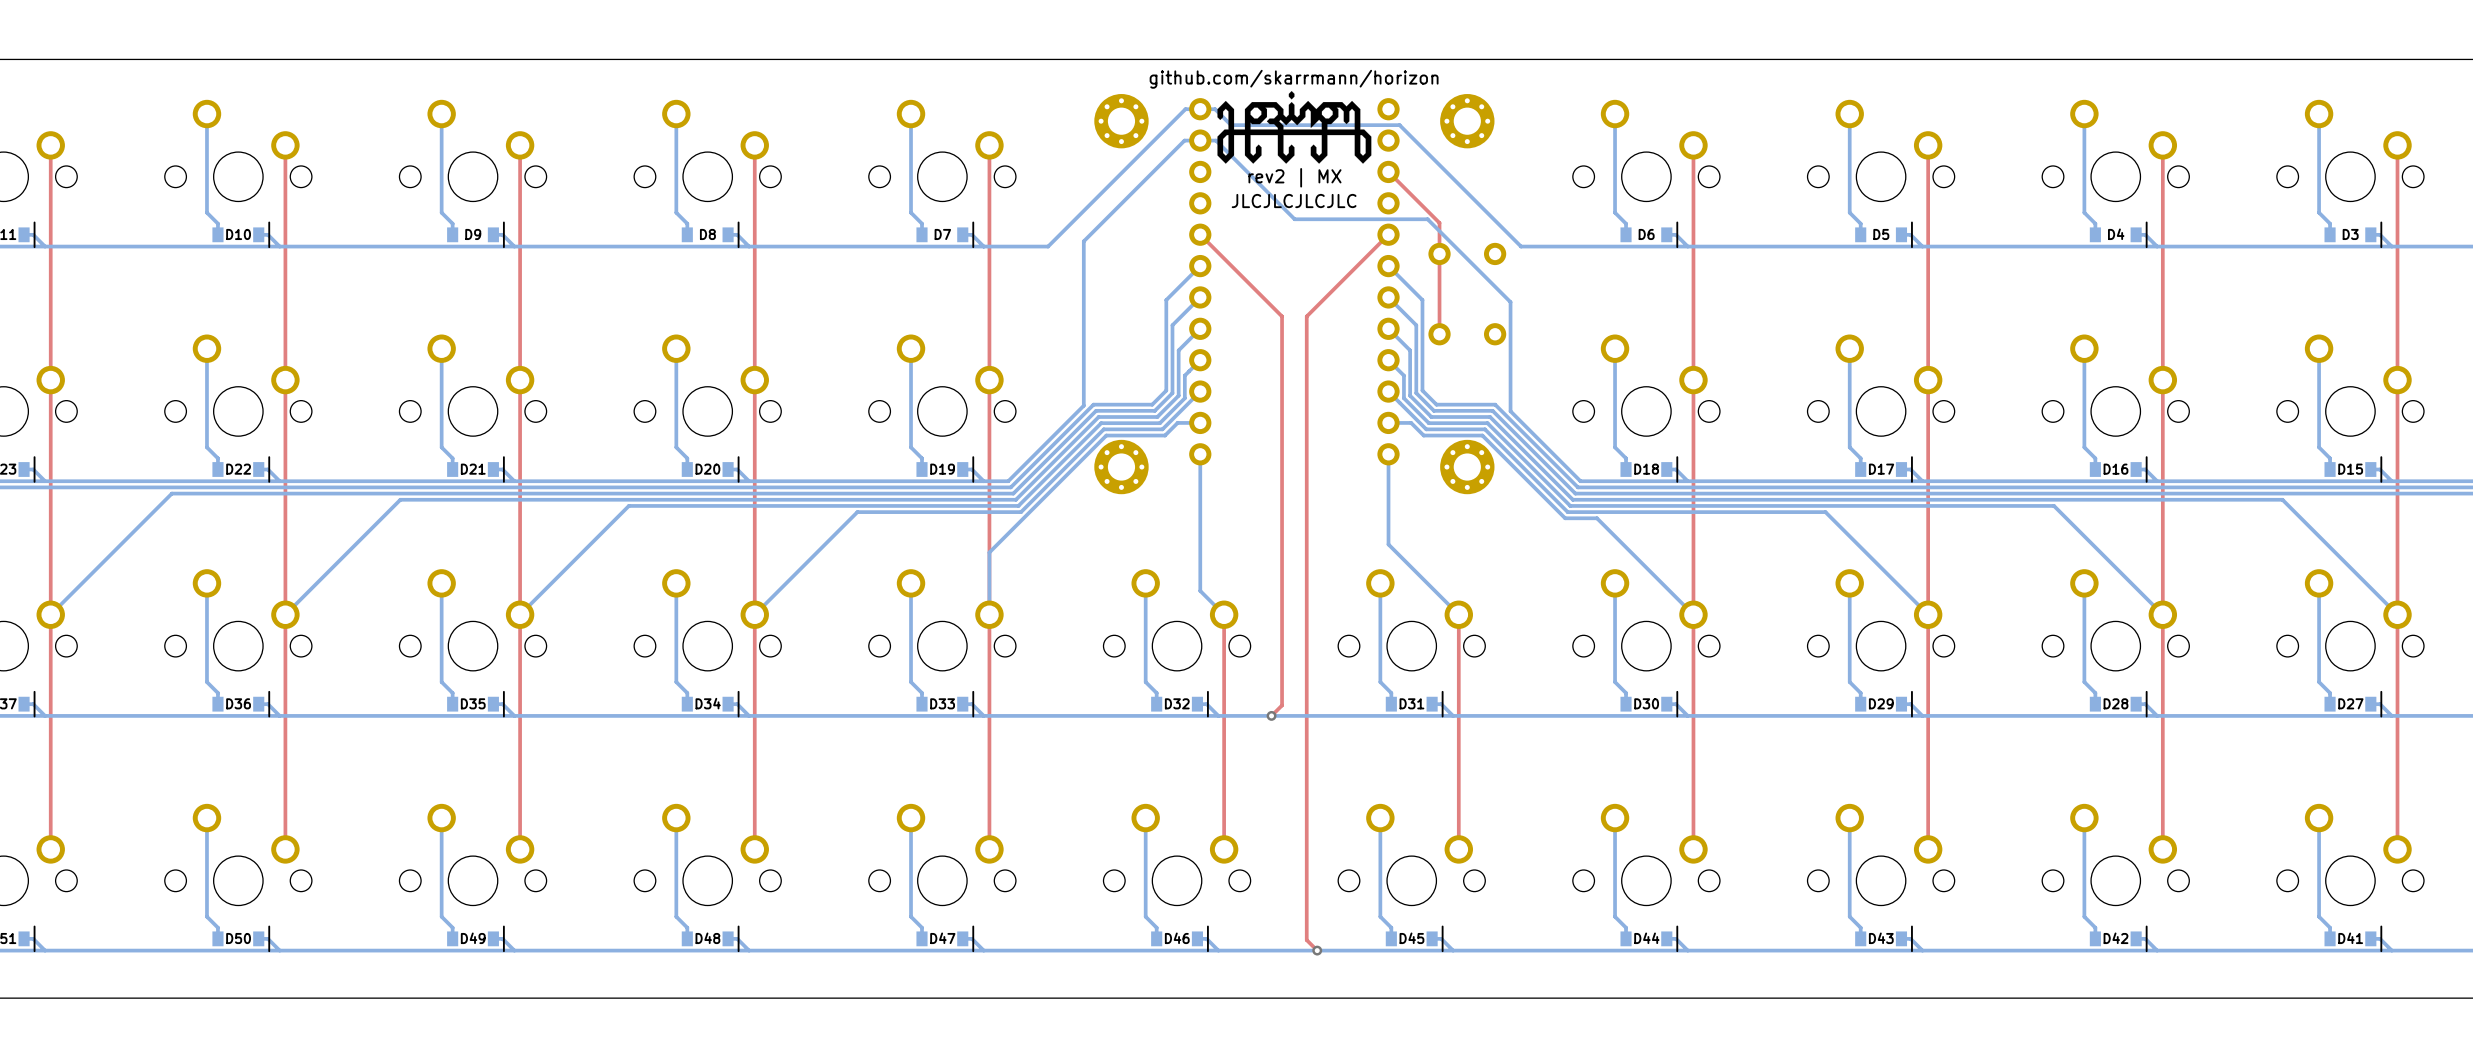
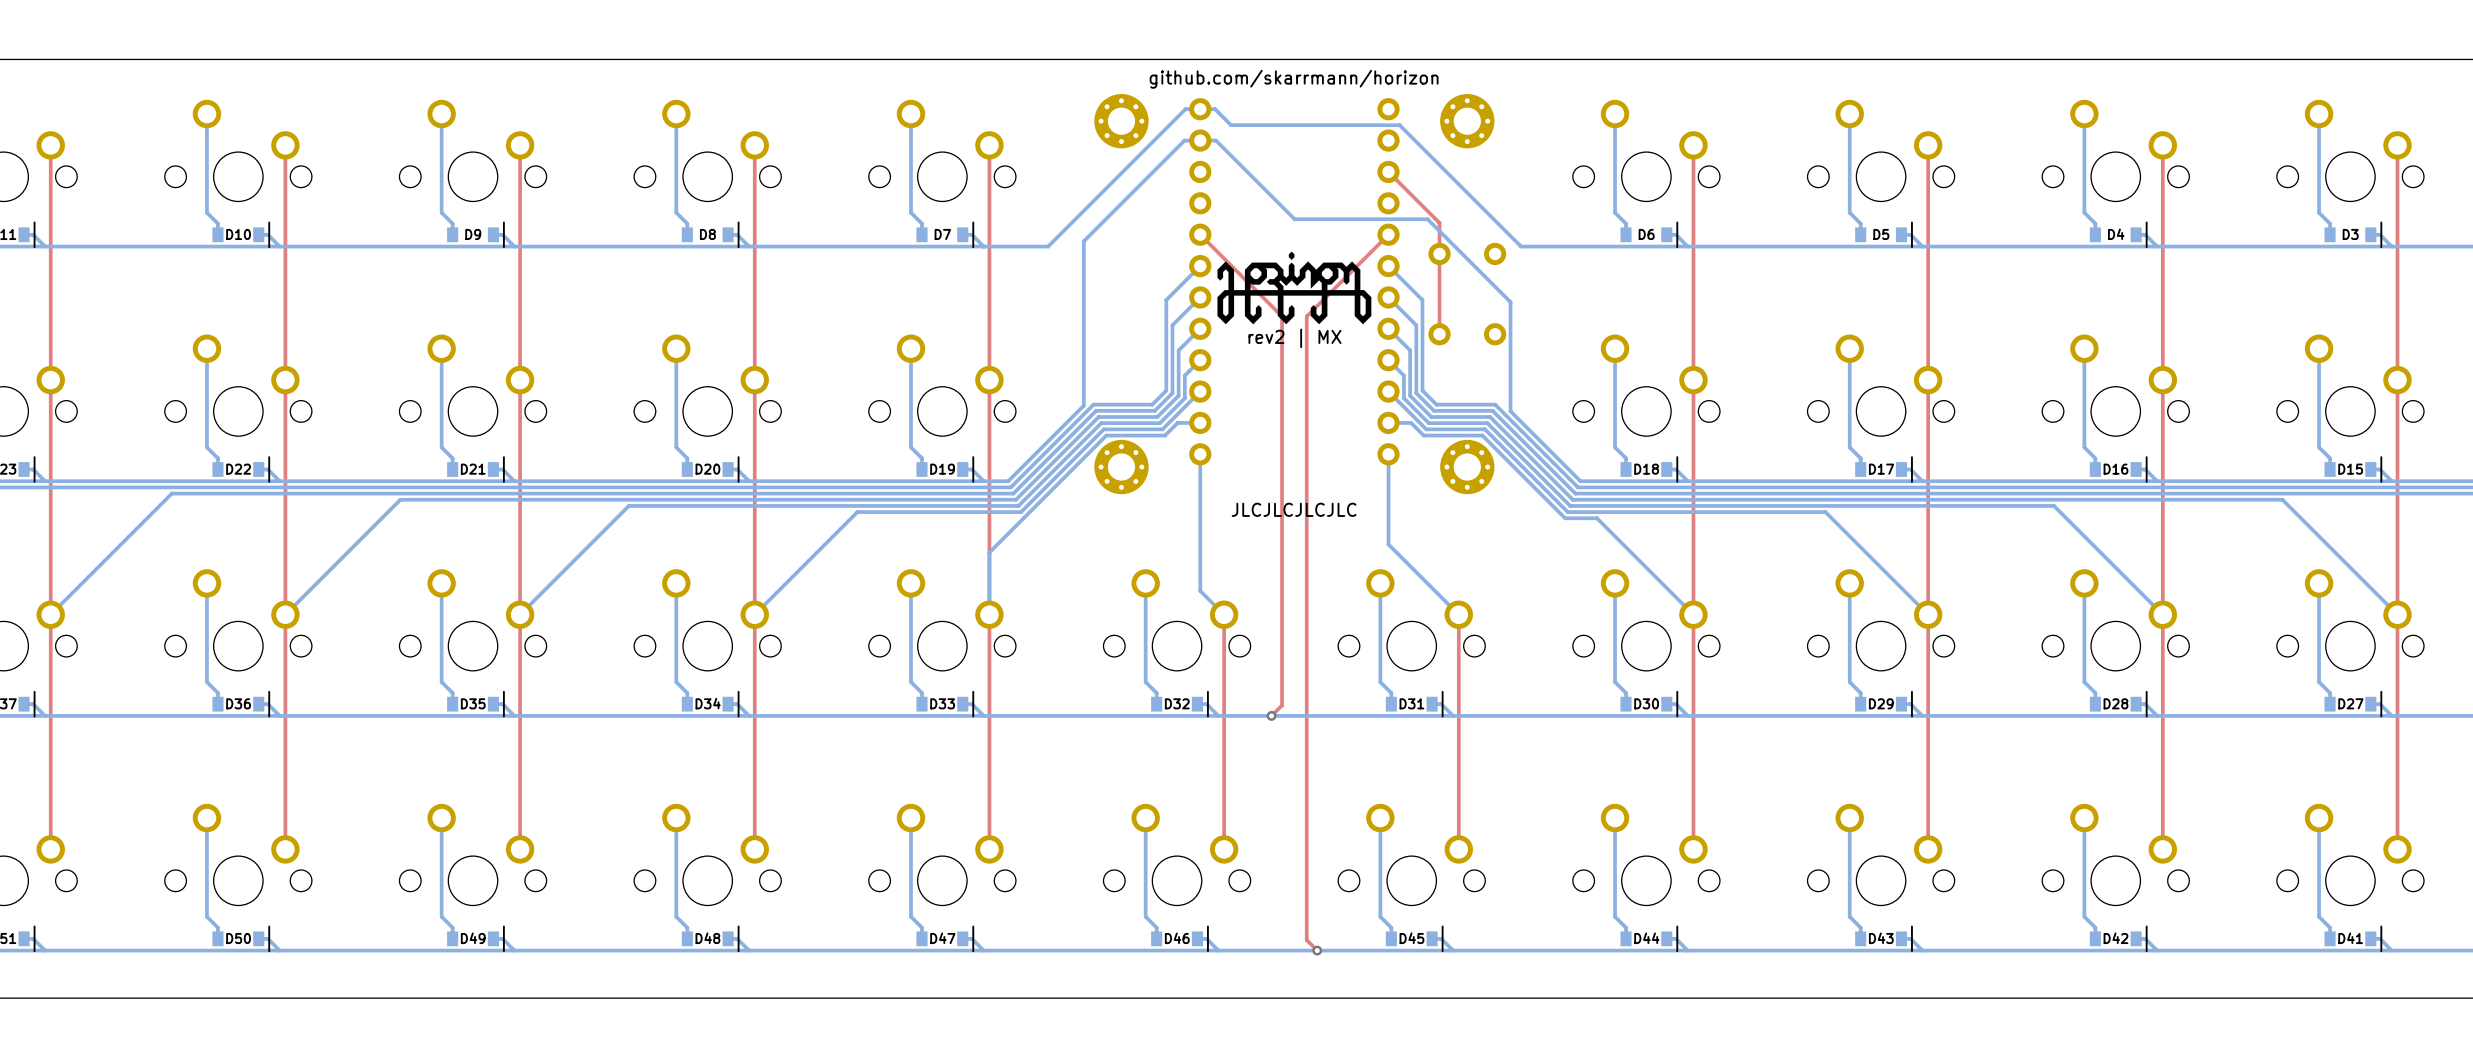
drawing position: (1294, 127) -> (1294, 287)
text position: rev2 | MX (1294, 177) -> rev2 | MX (1294, 338)
text position: JLCJLCJLCJLC (1294, 201) -> JLCJLCJLCJLC (1294, 509)

